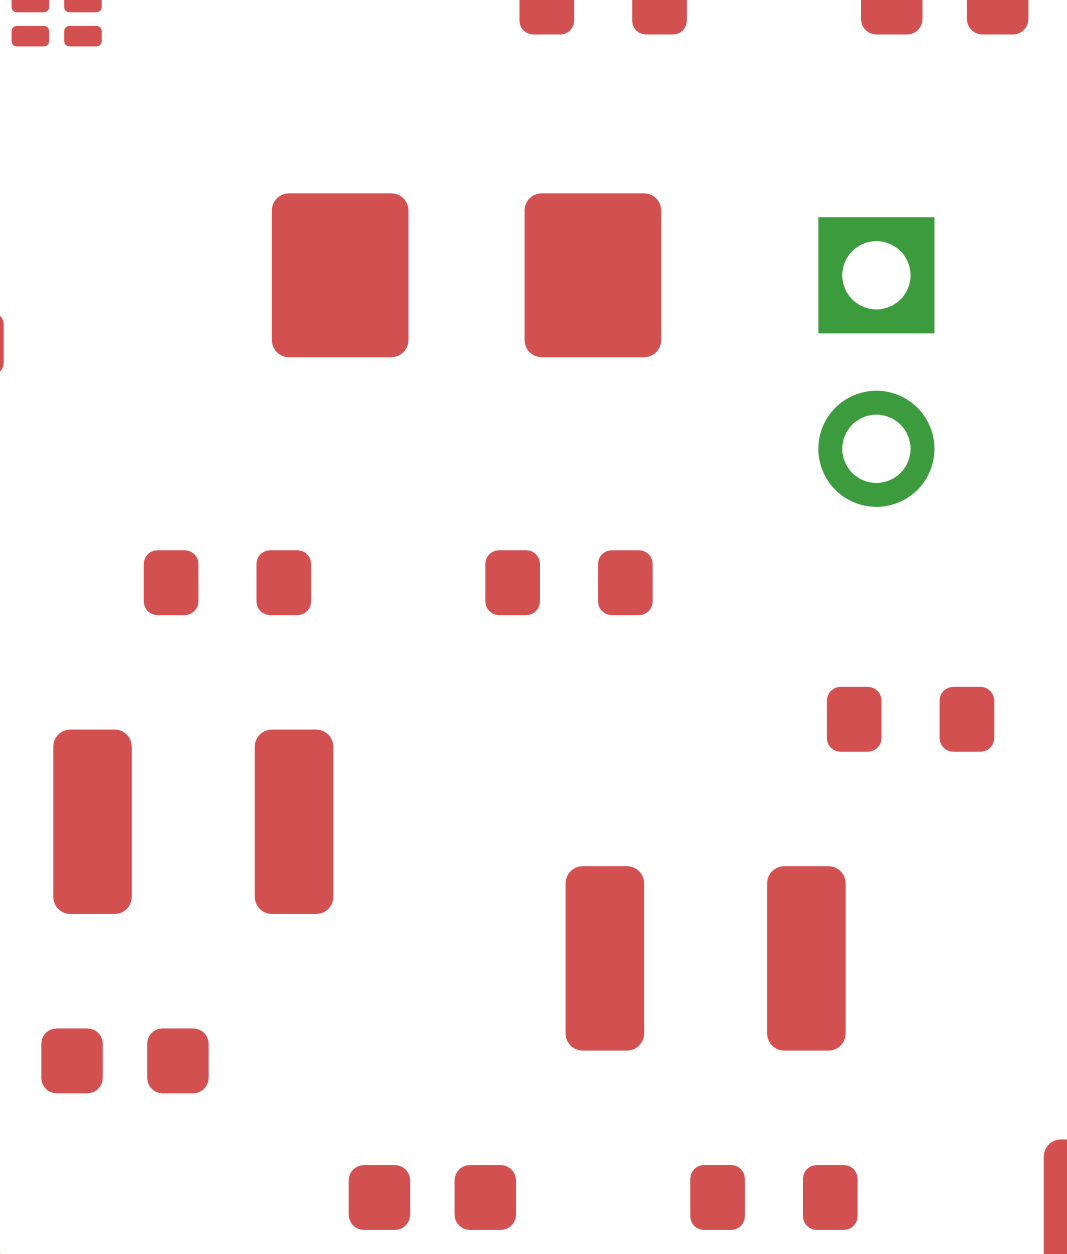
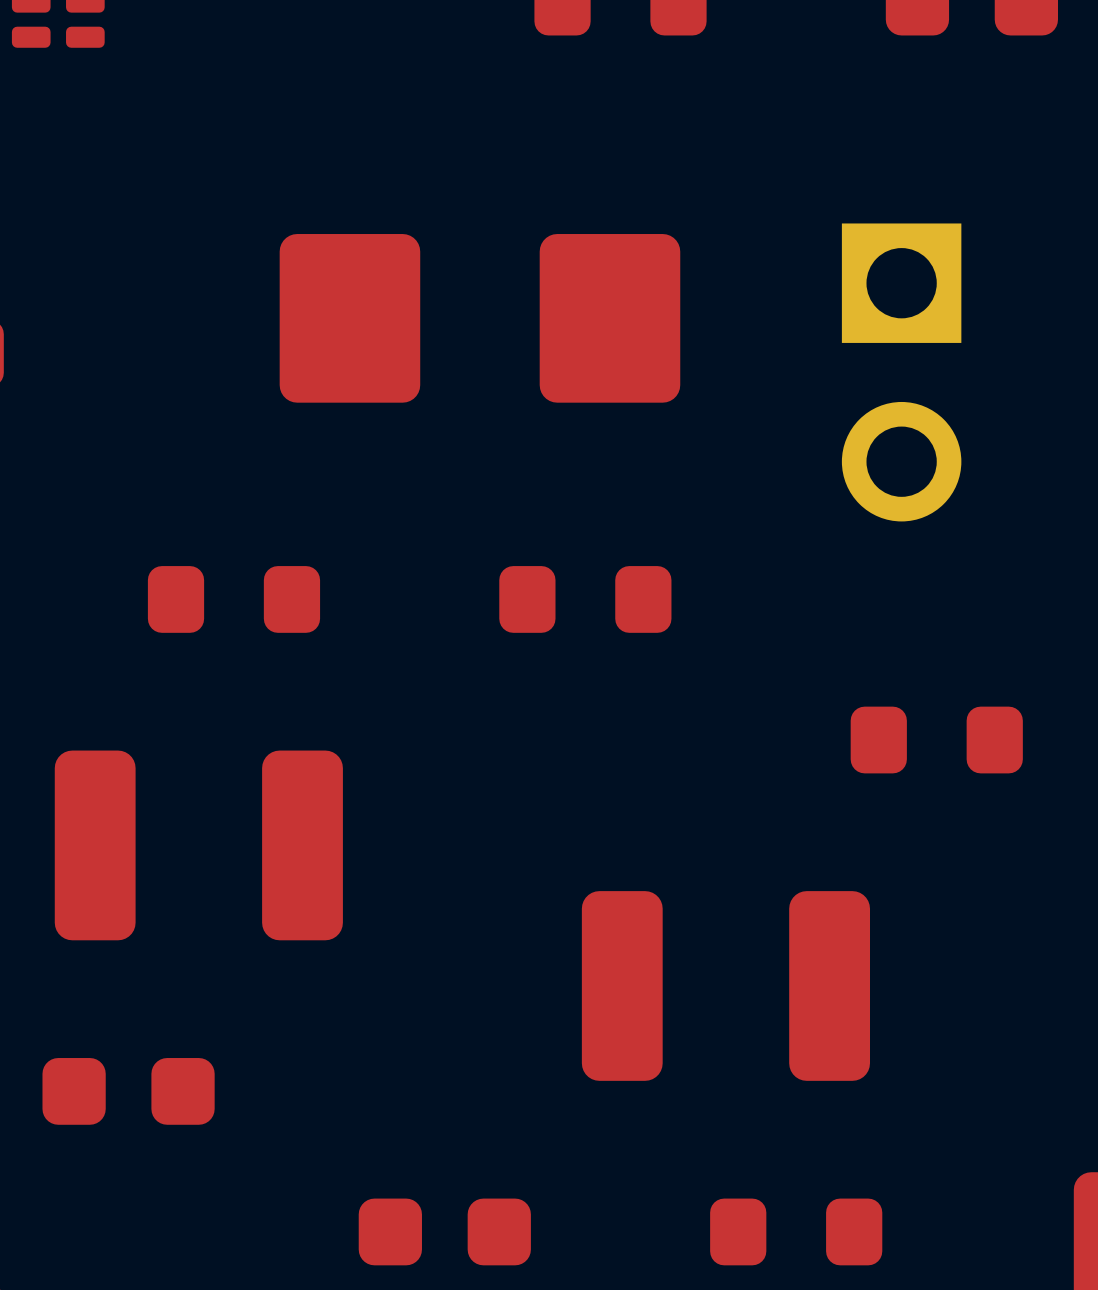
part position: (466, 275) -> (479, 318)

